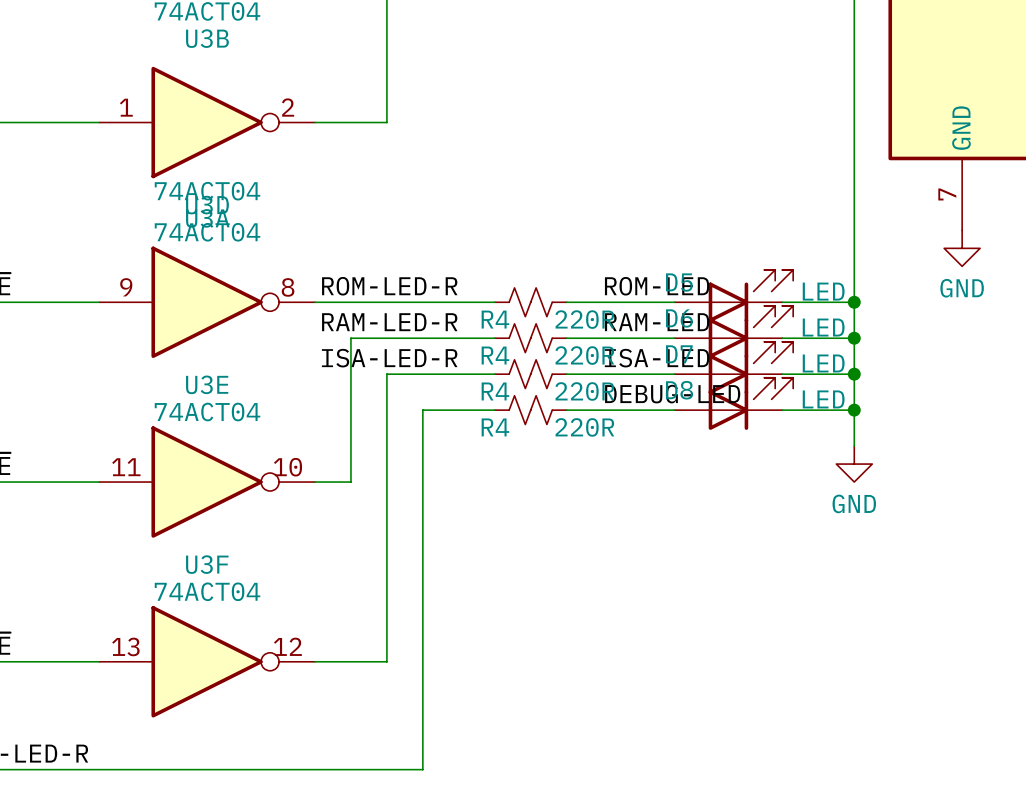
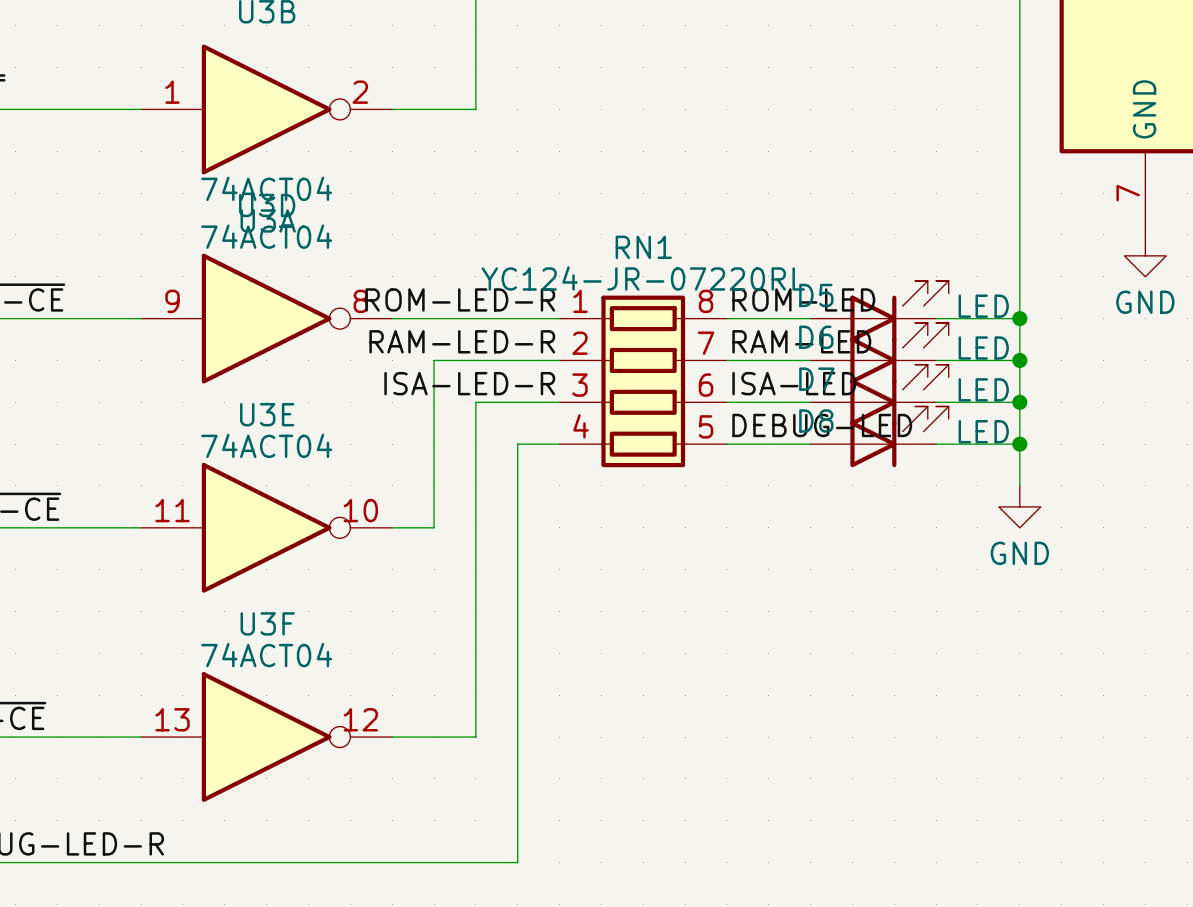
R4: 220R (530, 302) -> none
R4: 220R (530, 338) -> none
RN1: none -> YC124-JR-07220RL (643, 381)
R4: 220R (530, 374) -> none
R4: 220R (530, 410) -> none

